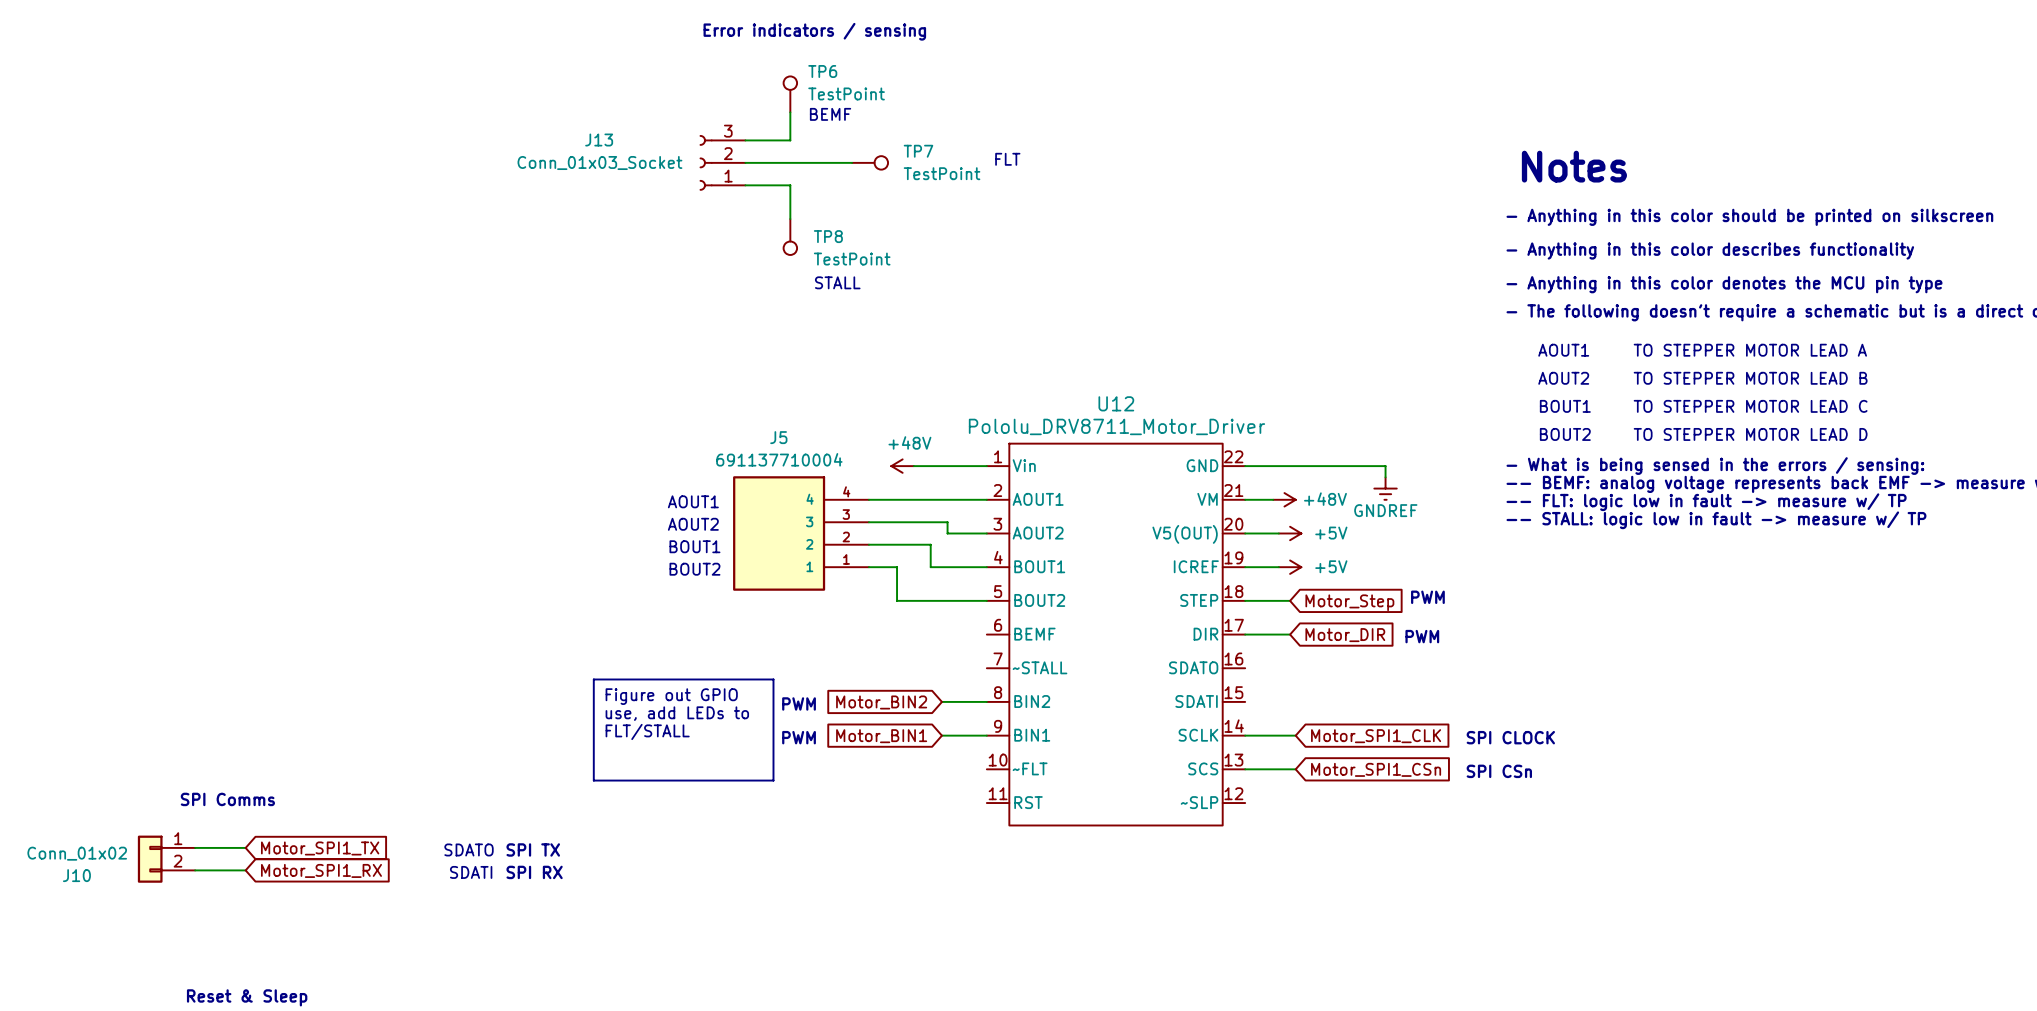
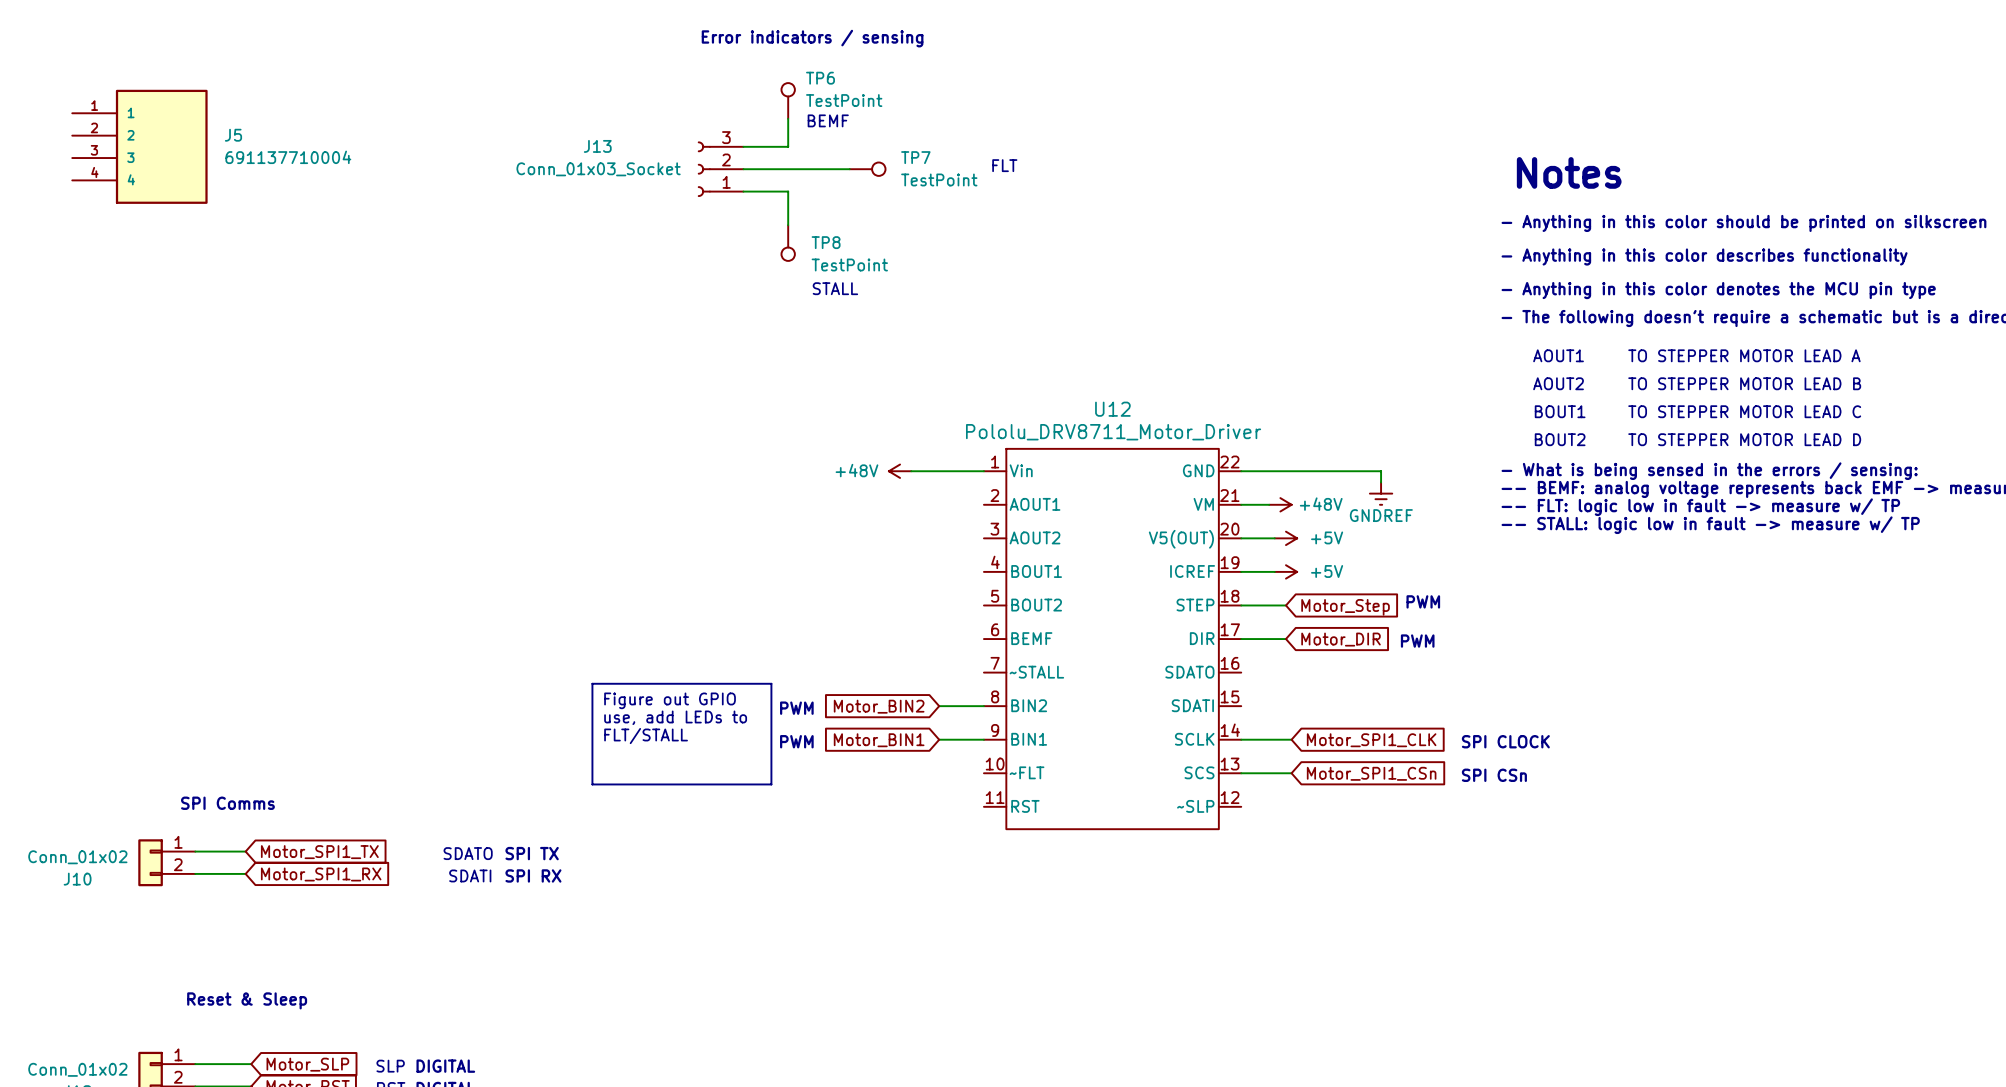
J5 name position: J5 (778, 437) -> J5 (233, 135)
power symbol text position: +48V (909, 442) -> +48V (856, 470)
J5 value position: 691137710004 (779, 459) -> 691137710004 (288, 157)
wire: (868, 499) (986, 499) -> none
text: AOUT1 (693, 501) -> none
wire: (868, 522) (947, 522) (947, 533) (986, 533) -> none
text: AOUT2 (693, 524) -> none
J5 rotation: 0° (779, 533) -> 180° (161, 146)
J5 position: (801, 533) -> (139, 146)
wire: (868, 544) (930, 544) (930, 567) (986, 567) -> none
text: BOUT1 (694, 546) -> none
wire: (868, 567) (897, 567) (897, 600) (986, 600) -> none
text: BOUT2 (694, 569) -> none

